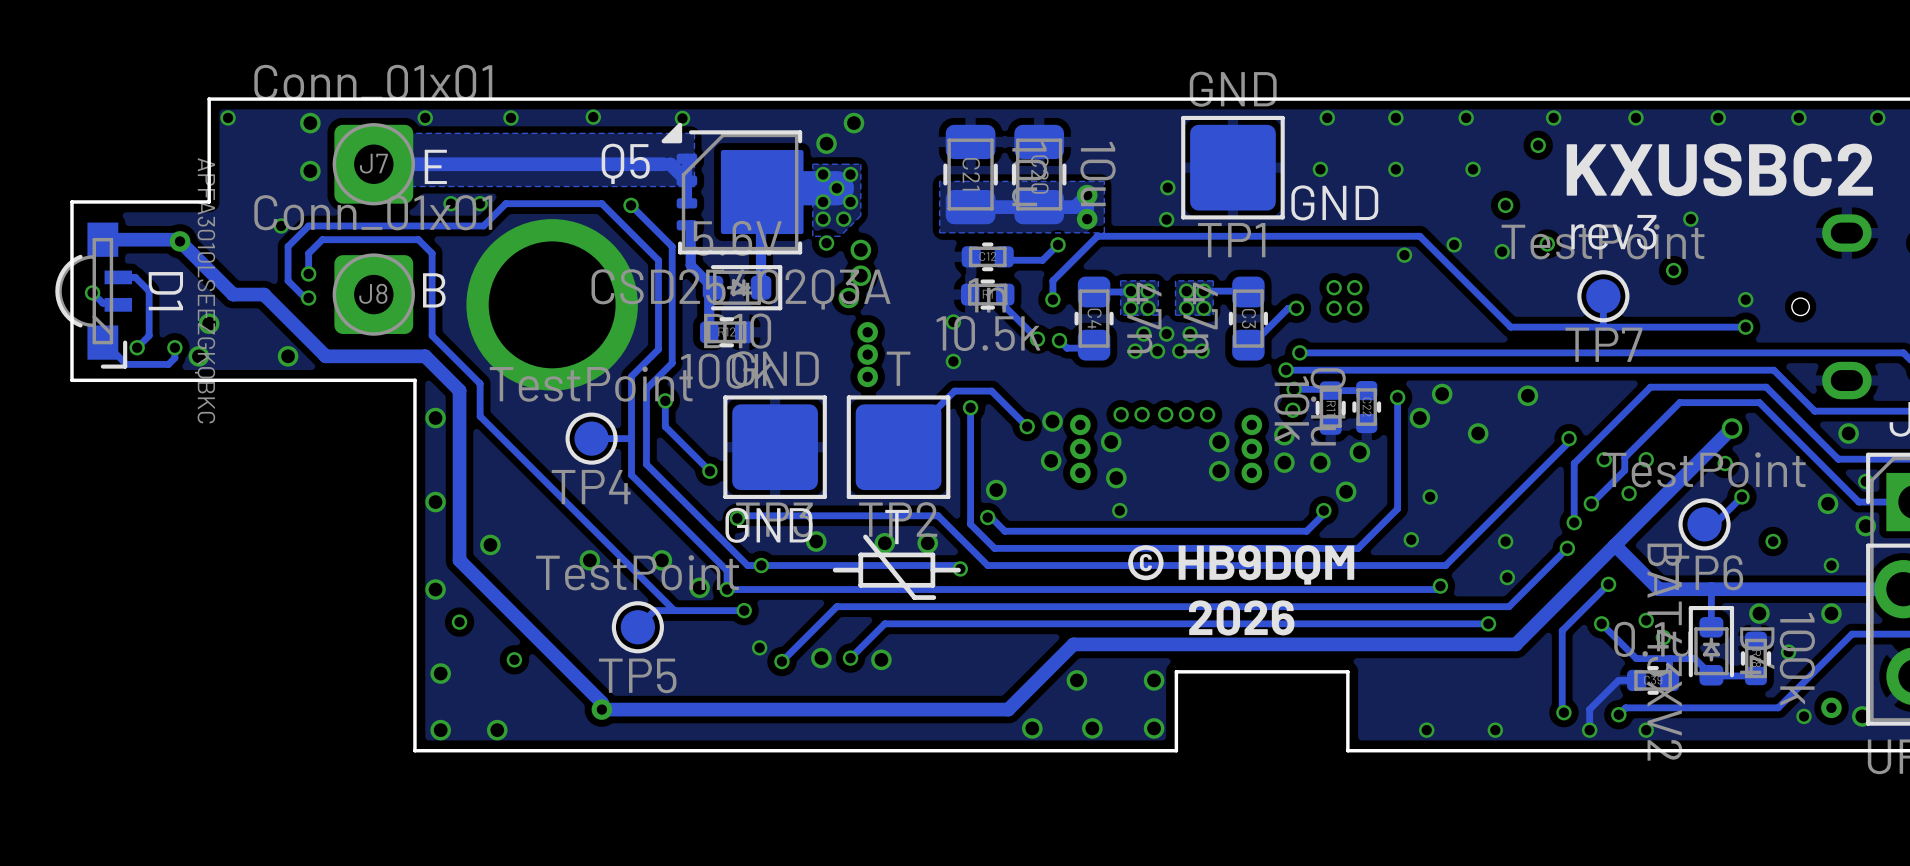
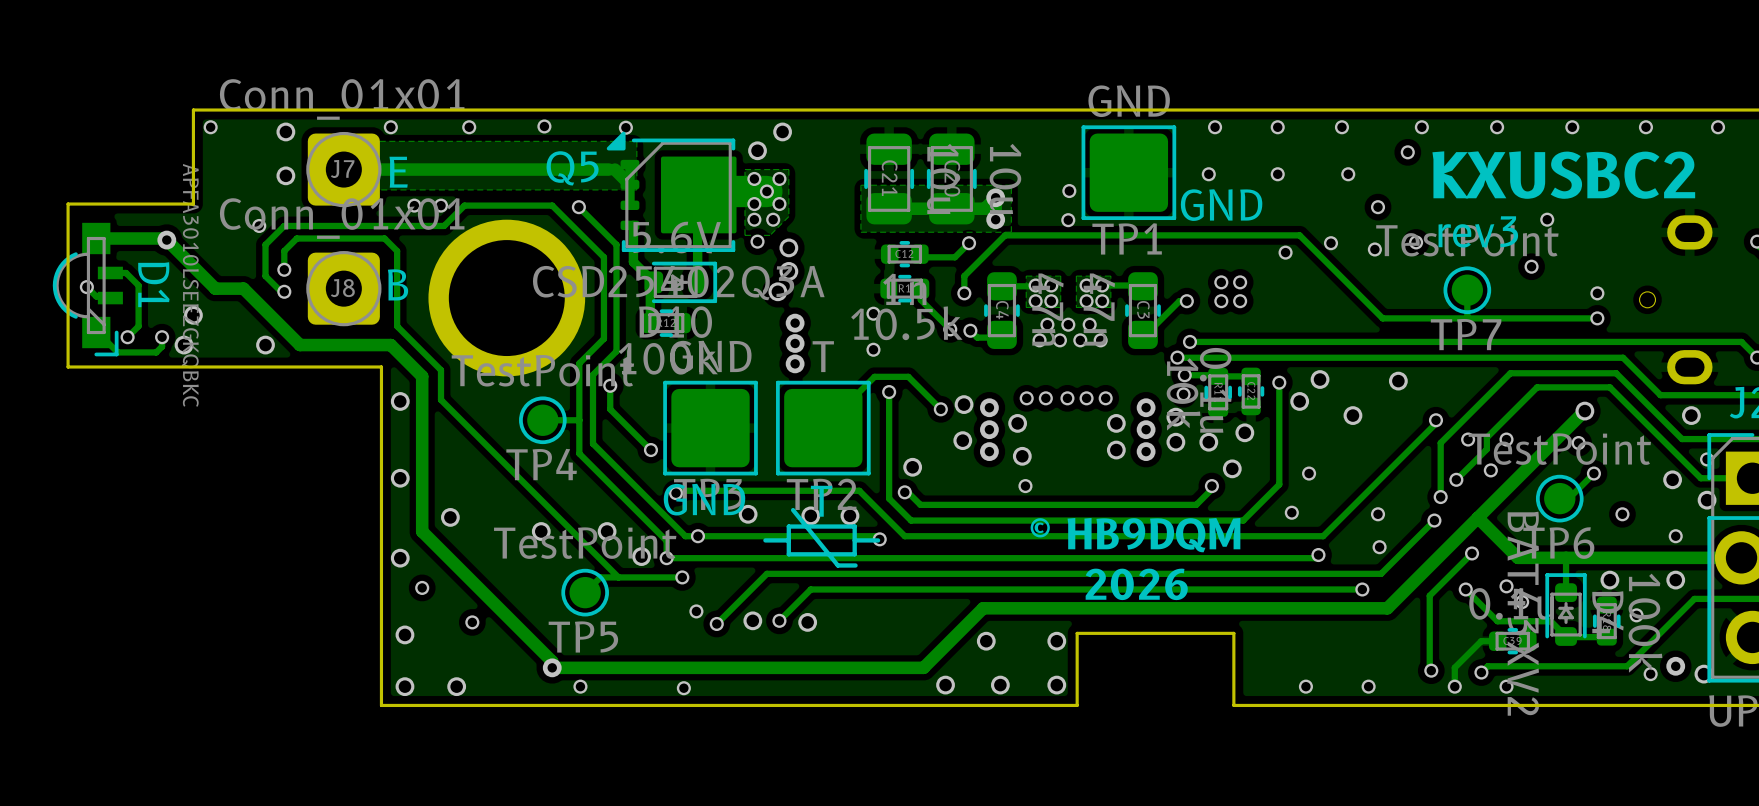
via: none -> (580, 686)
via: none -> (683, 688)

